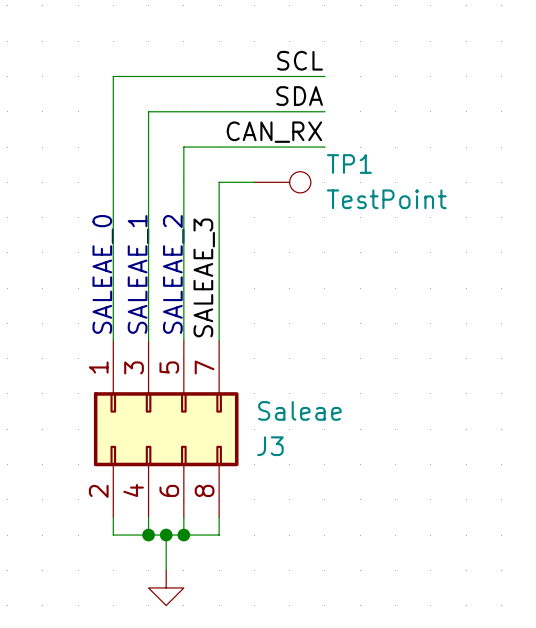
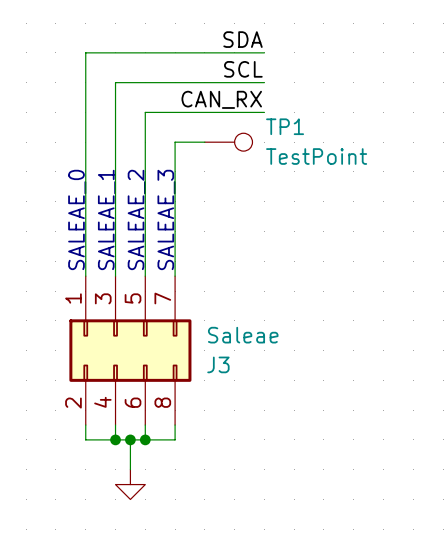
label: SCL (300, 60) -> SDA (243, 39)
label: SDA (299, 96) -> SCL (243, 69)
text: none -> SALEAE_3 (166, 219)
label: SALEAE_3 (204, 277) -> none

